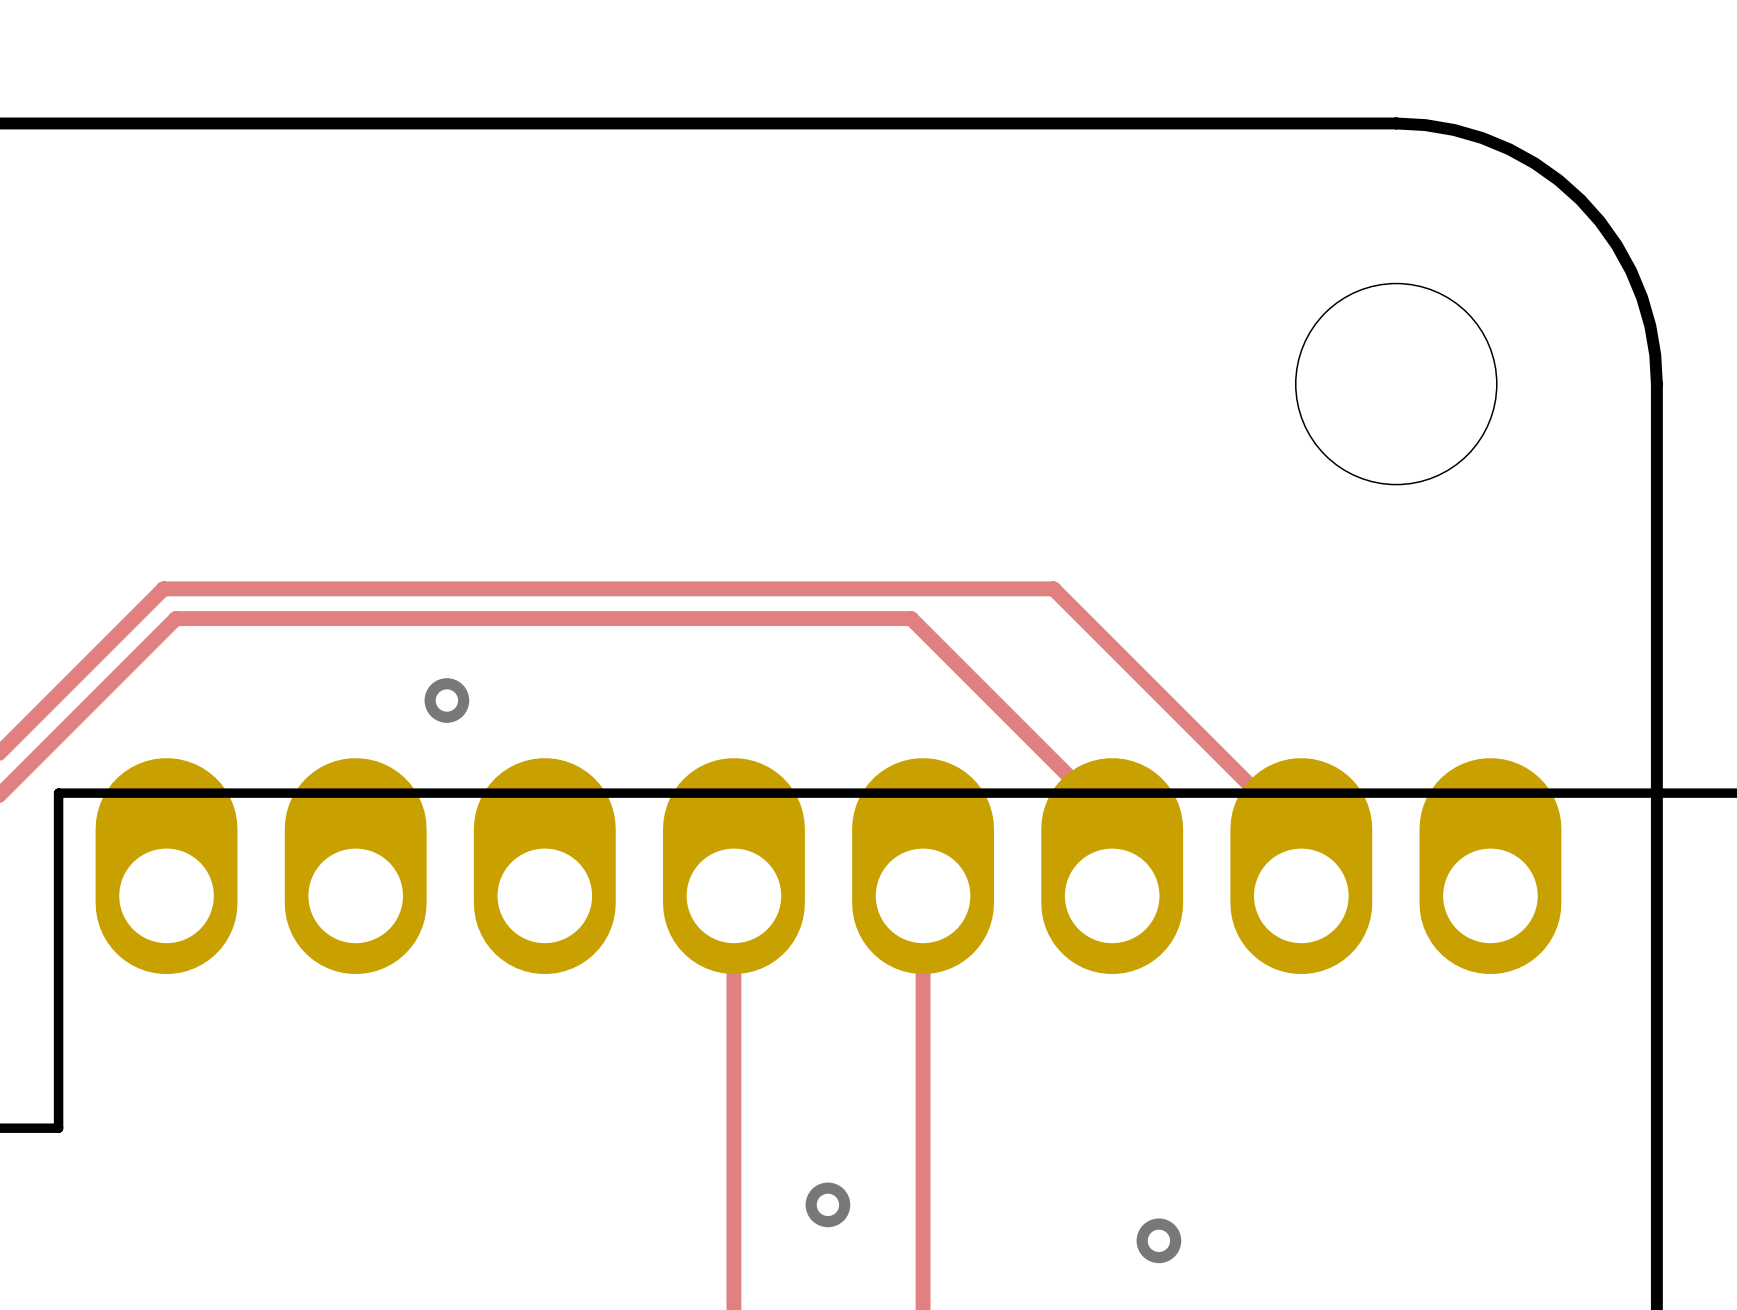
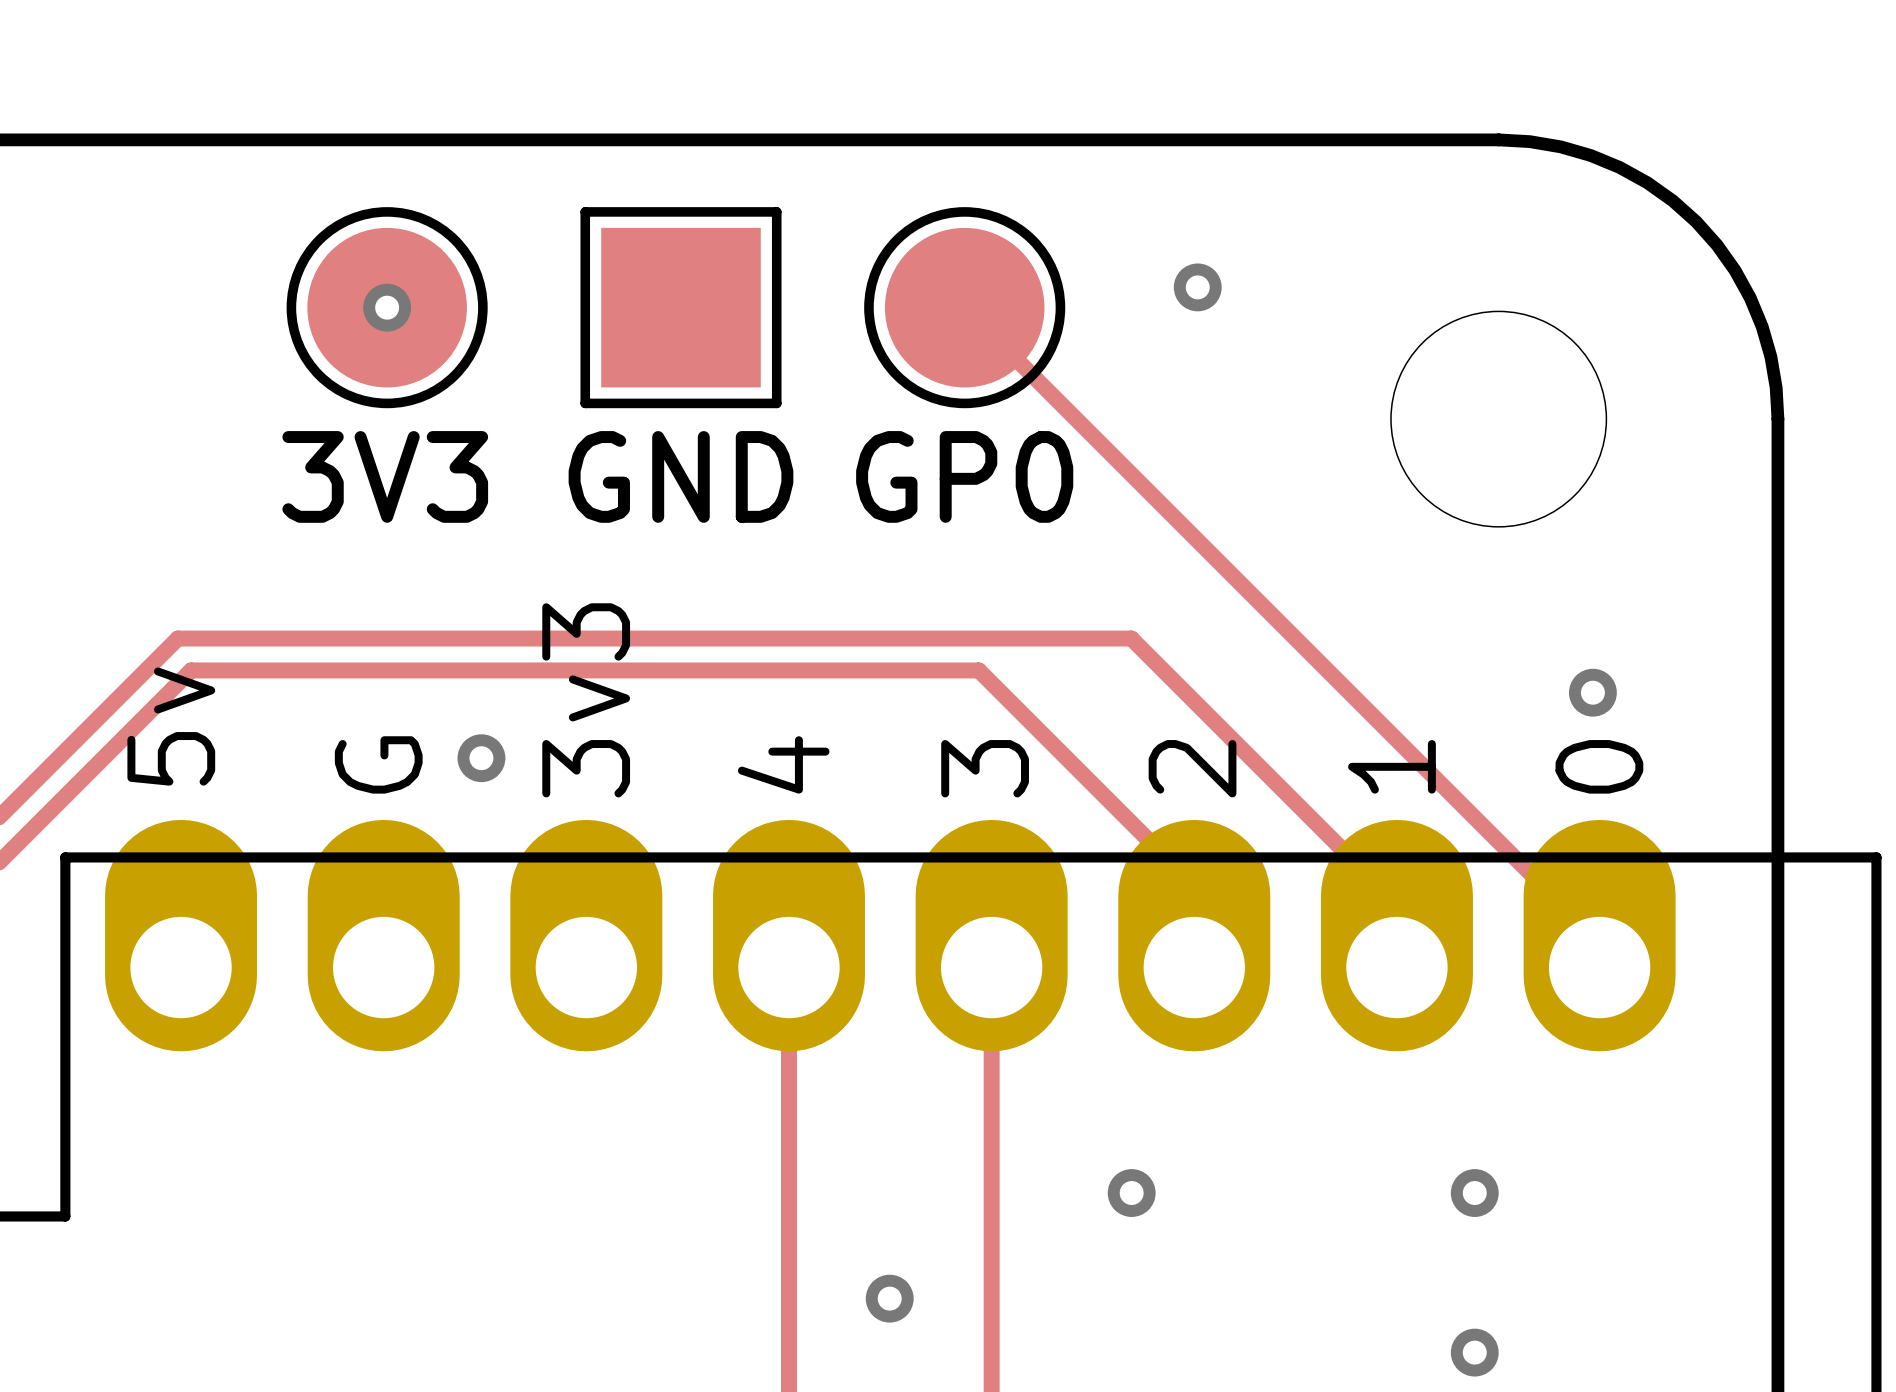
via: none -> (1197, 287)
part: none -> 3V3 (387, 307)
via: none -> (387, 307)
part: none -> GND (680, 307)
track: none -> (964, 307) (1599, 942) (1599, 967)
part: none -> GP0 (964, 307)
via: none -> (1592, 692)
text: none -> 3v3 (586, 700)
text: none -> 5v (171, 726)
text: none -> G (378, 764)
text: none -> 4 (783, 764)
text: none -> 1 (1391, 766)
text: none -> 0 (1599, 766)
text: none -> 3 (985, 768)
text: none -> 2 (1192, 768)
via: none -> (1131, 1193)
via: none -> (1474, 1193)
via: (1158, 1240) -> none
via: none -> (1474, 1352)

